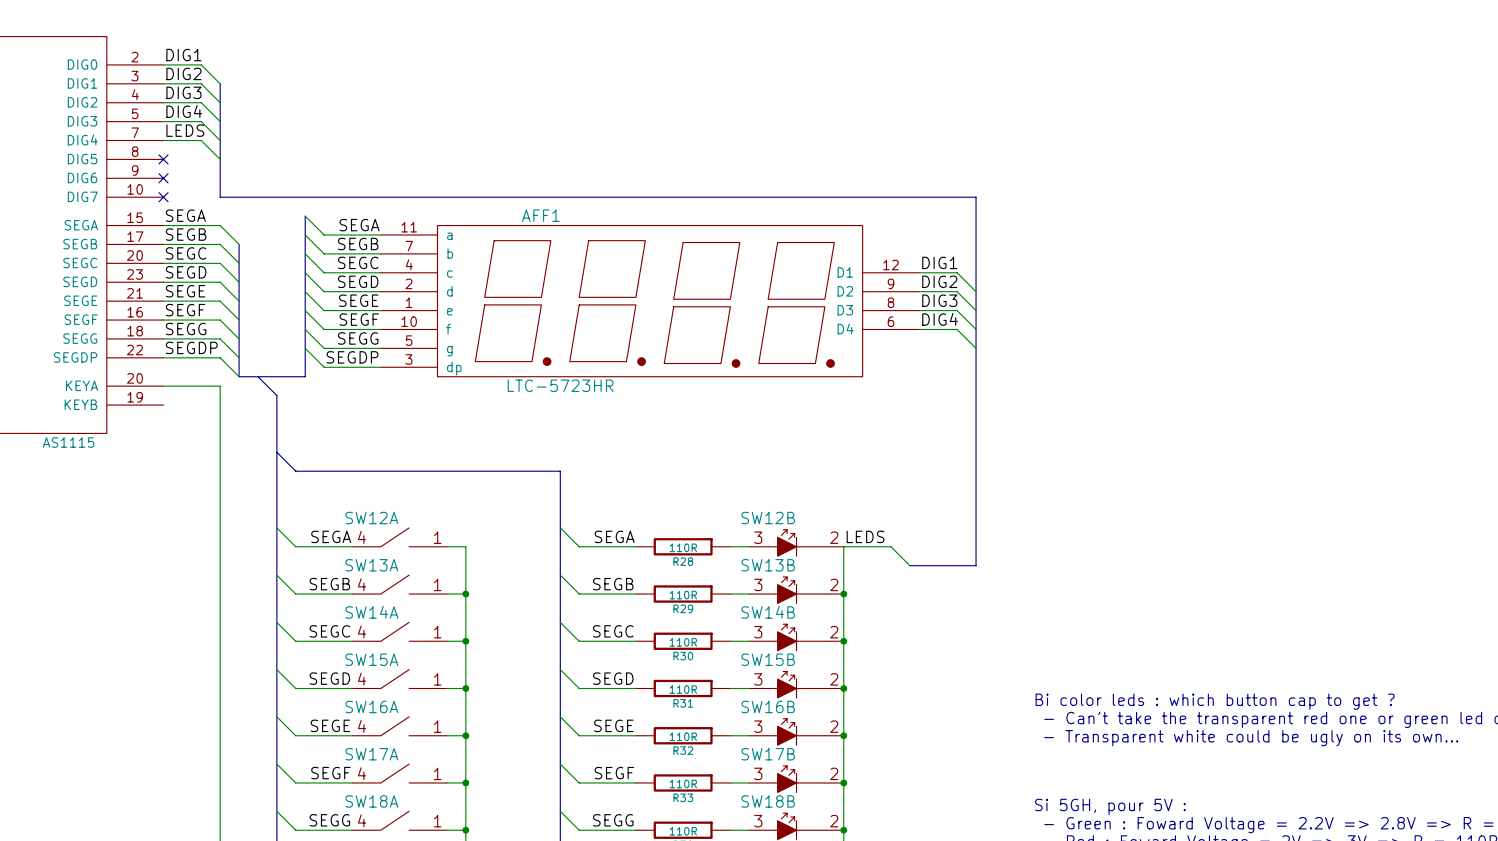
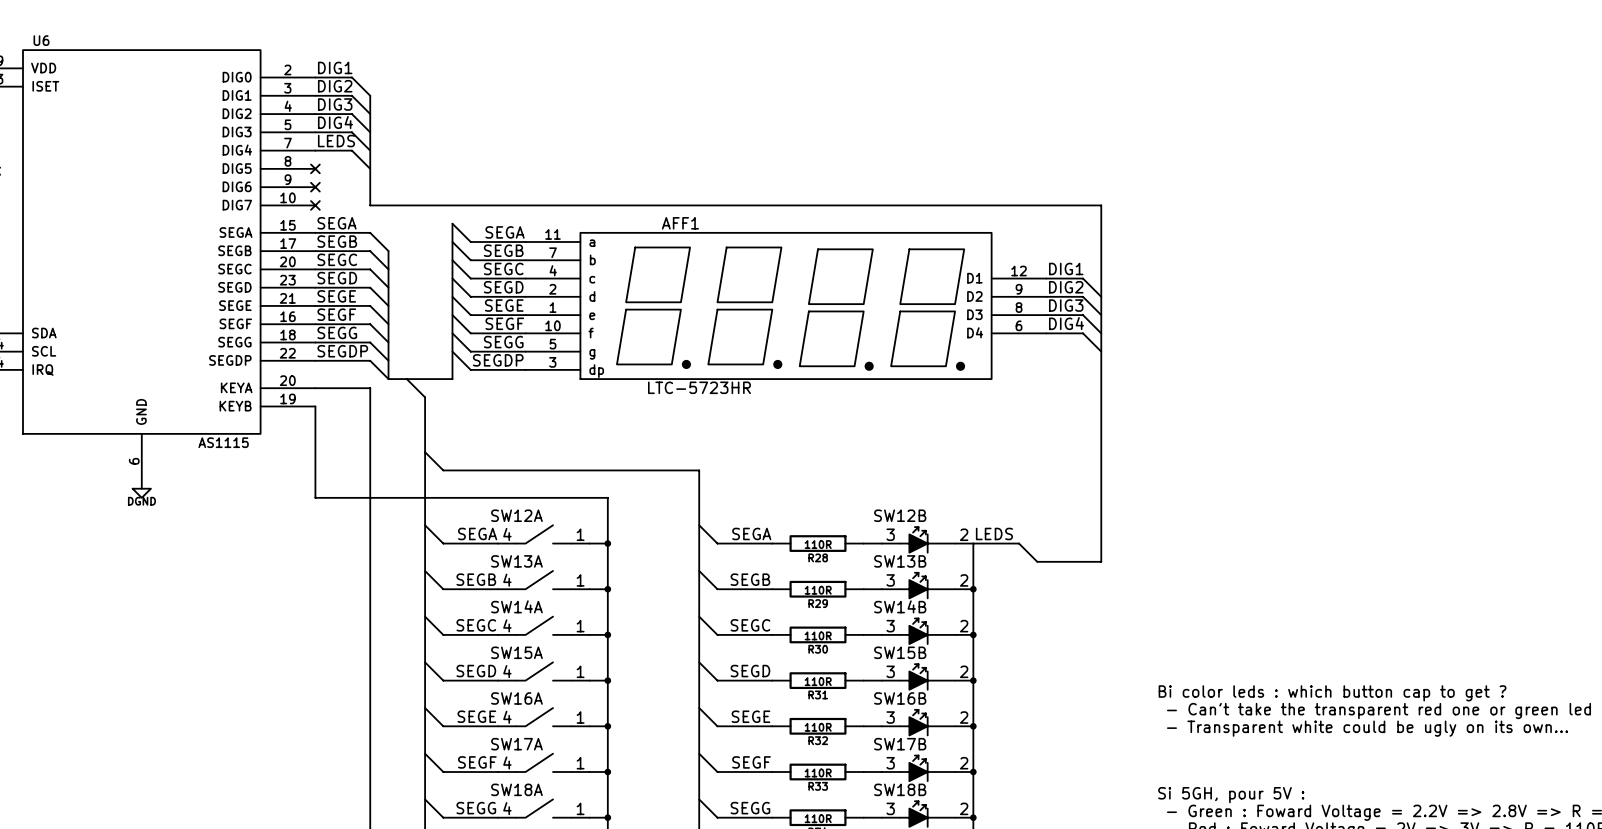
wire: none -> (315, 406) (315, 497) (607, 497) (607, 543)
junction: none -> (607, 543)

